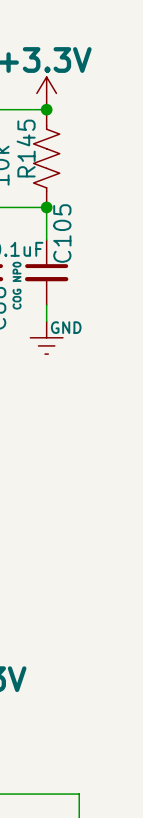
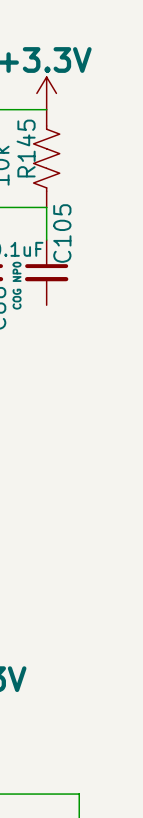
junction: (46, 109) -> none
junction: (46, 207) -> none
wire: (46, 305) (46, 321) -> none
power symbol: GND (46, 337) -> none

